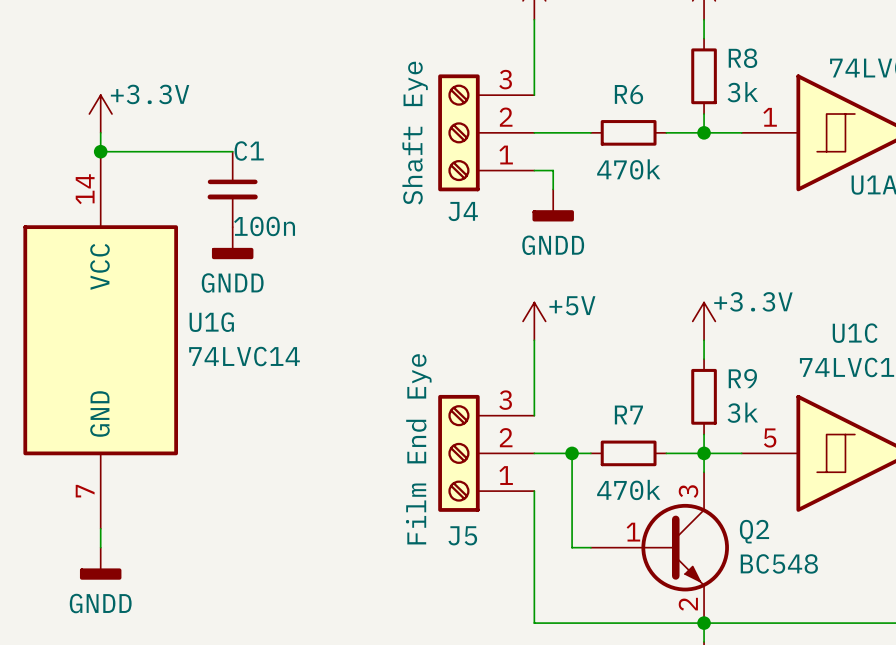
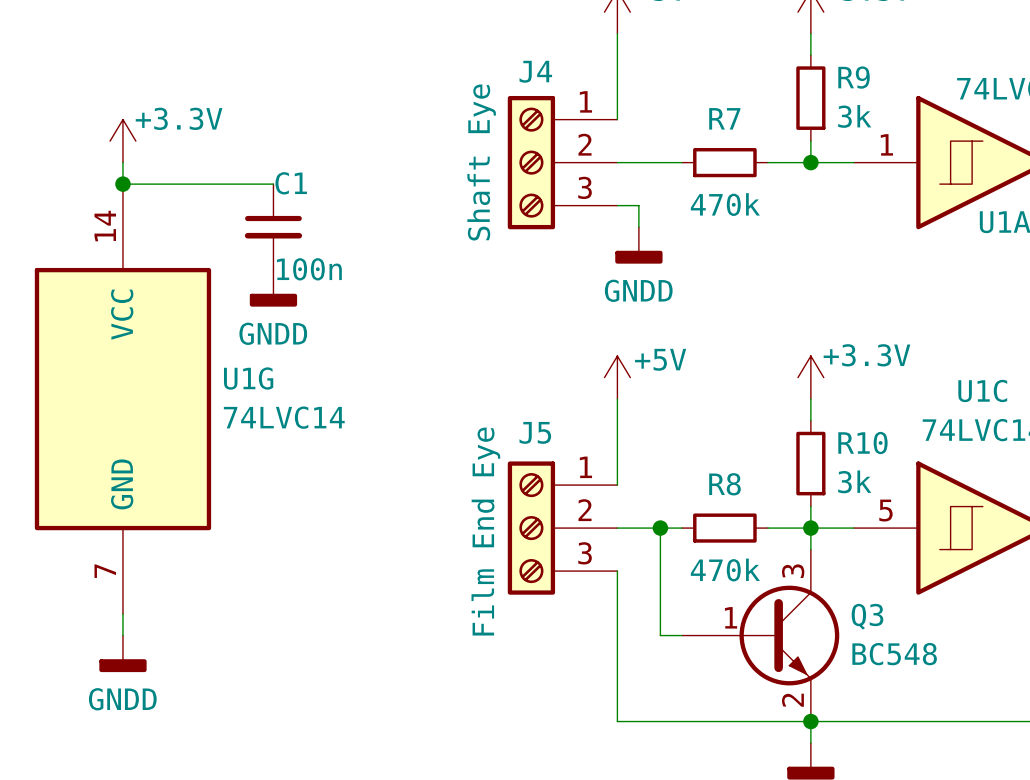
R8 name: R8 (742, 58) -> R9 (854, 77)
R6 name: R6 (628, 94) -> R7 (724, 118)
J4 flip: as is (458, 132) -> up-down (531, 162)
R9 name: R9 (742, 378) -> R10 (862, 443)
R7 name: R7 (628, 414) -> R8 (724, 484)
J5 flip: as is (458, 453) -> up-down (531, 528)
Q2 name: Q2 (754, 531) -> Q3 (867, 616)

